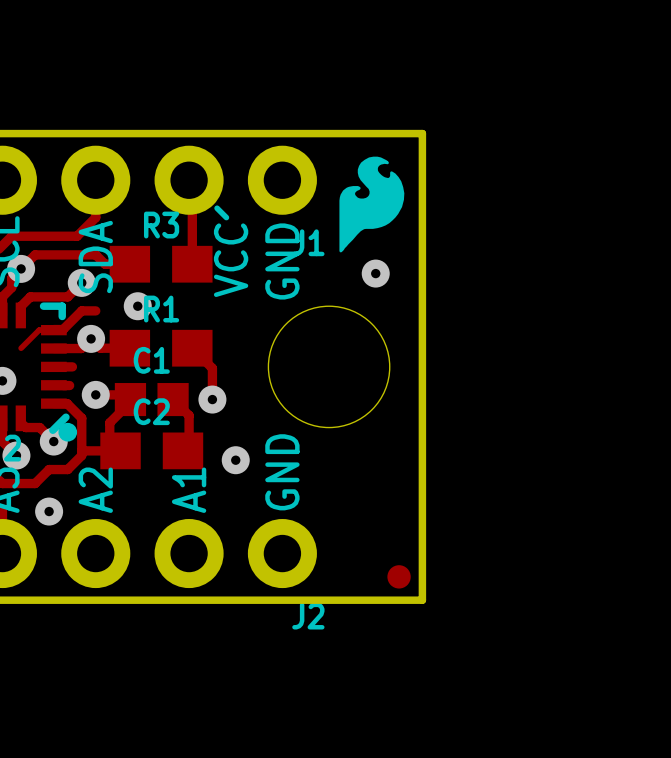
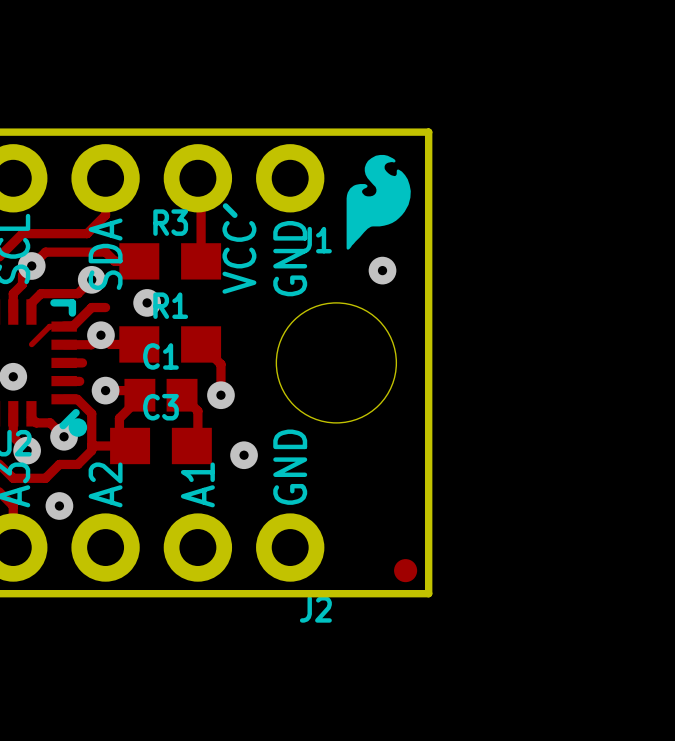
C2 name: C2 (151, 411) -> C3 (160, 407)

